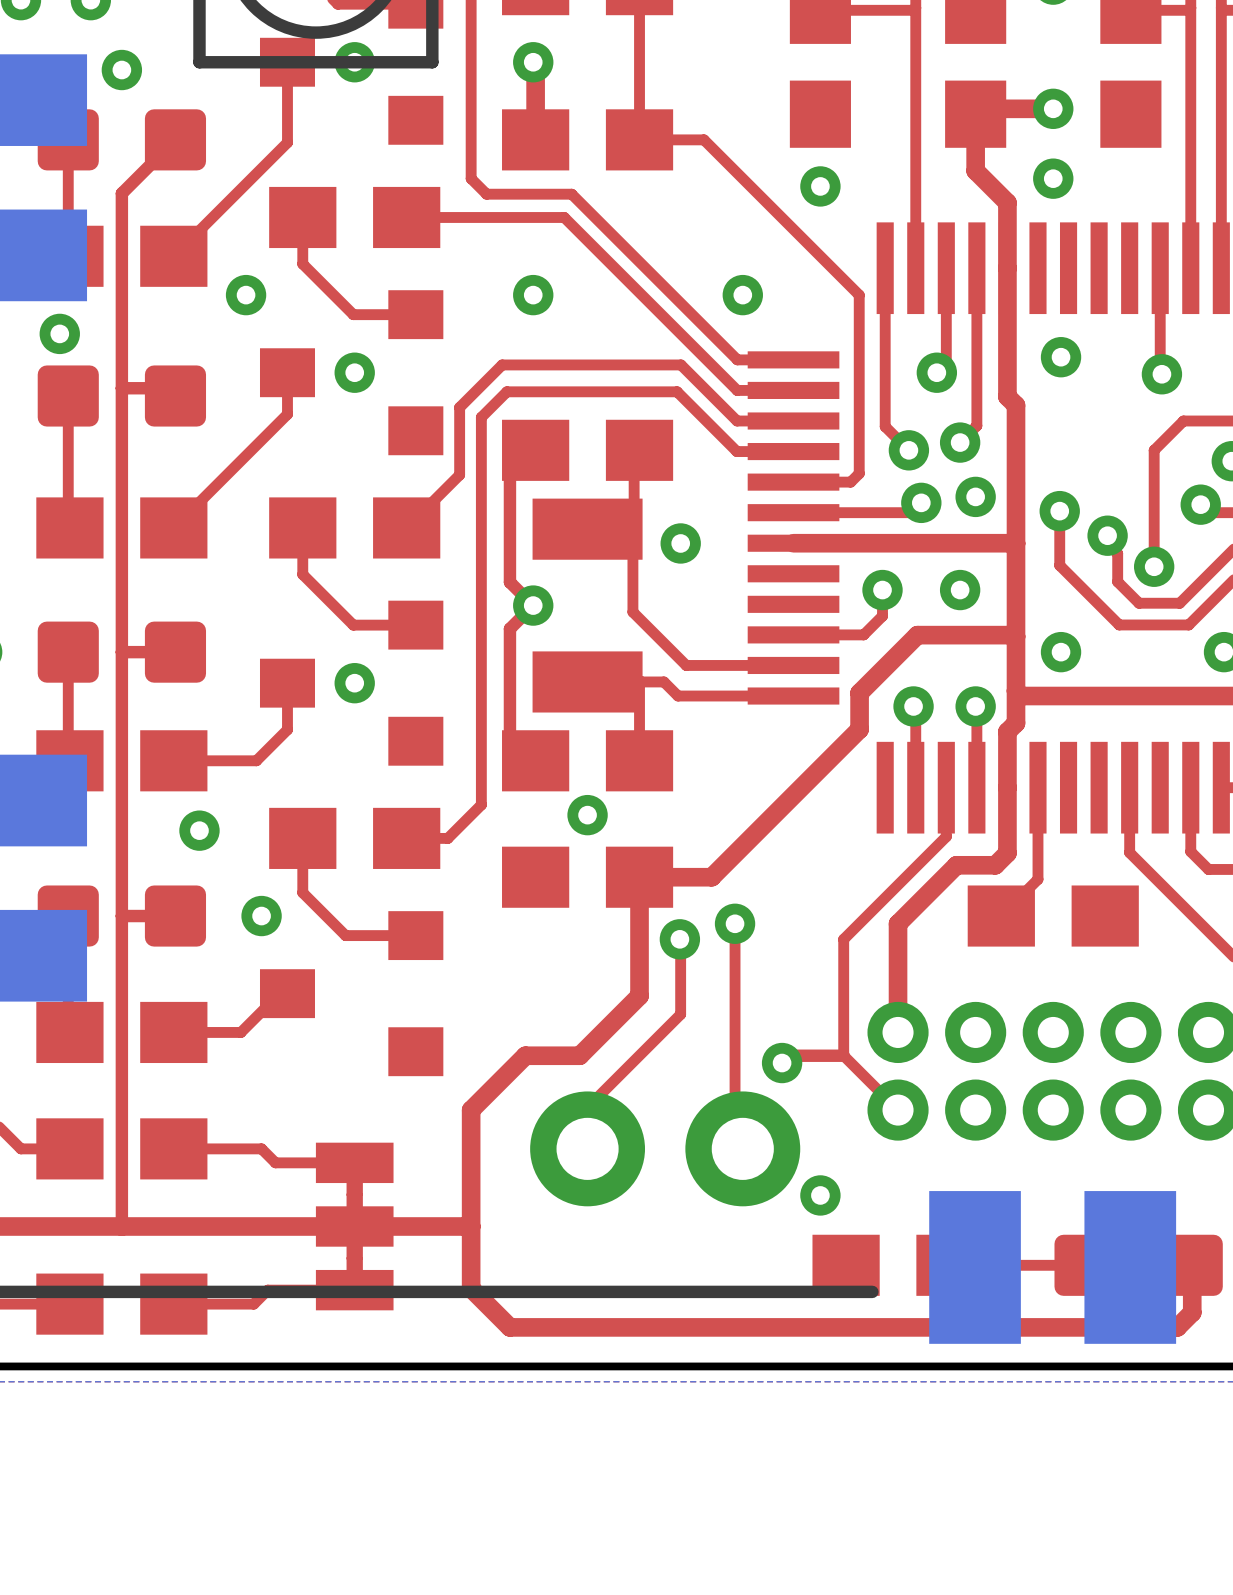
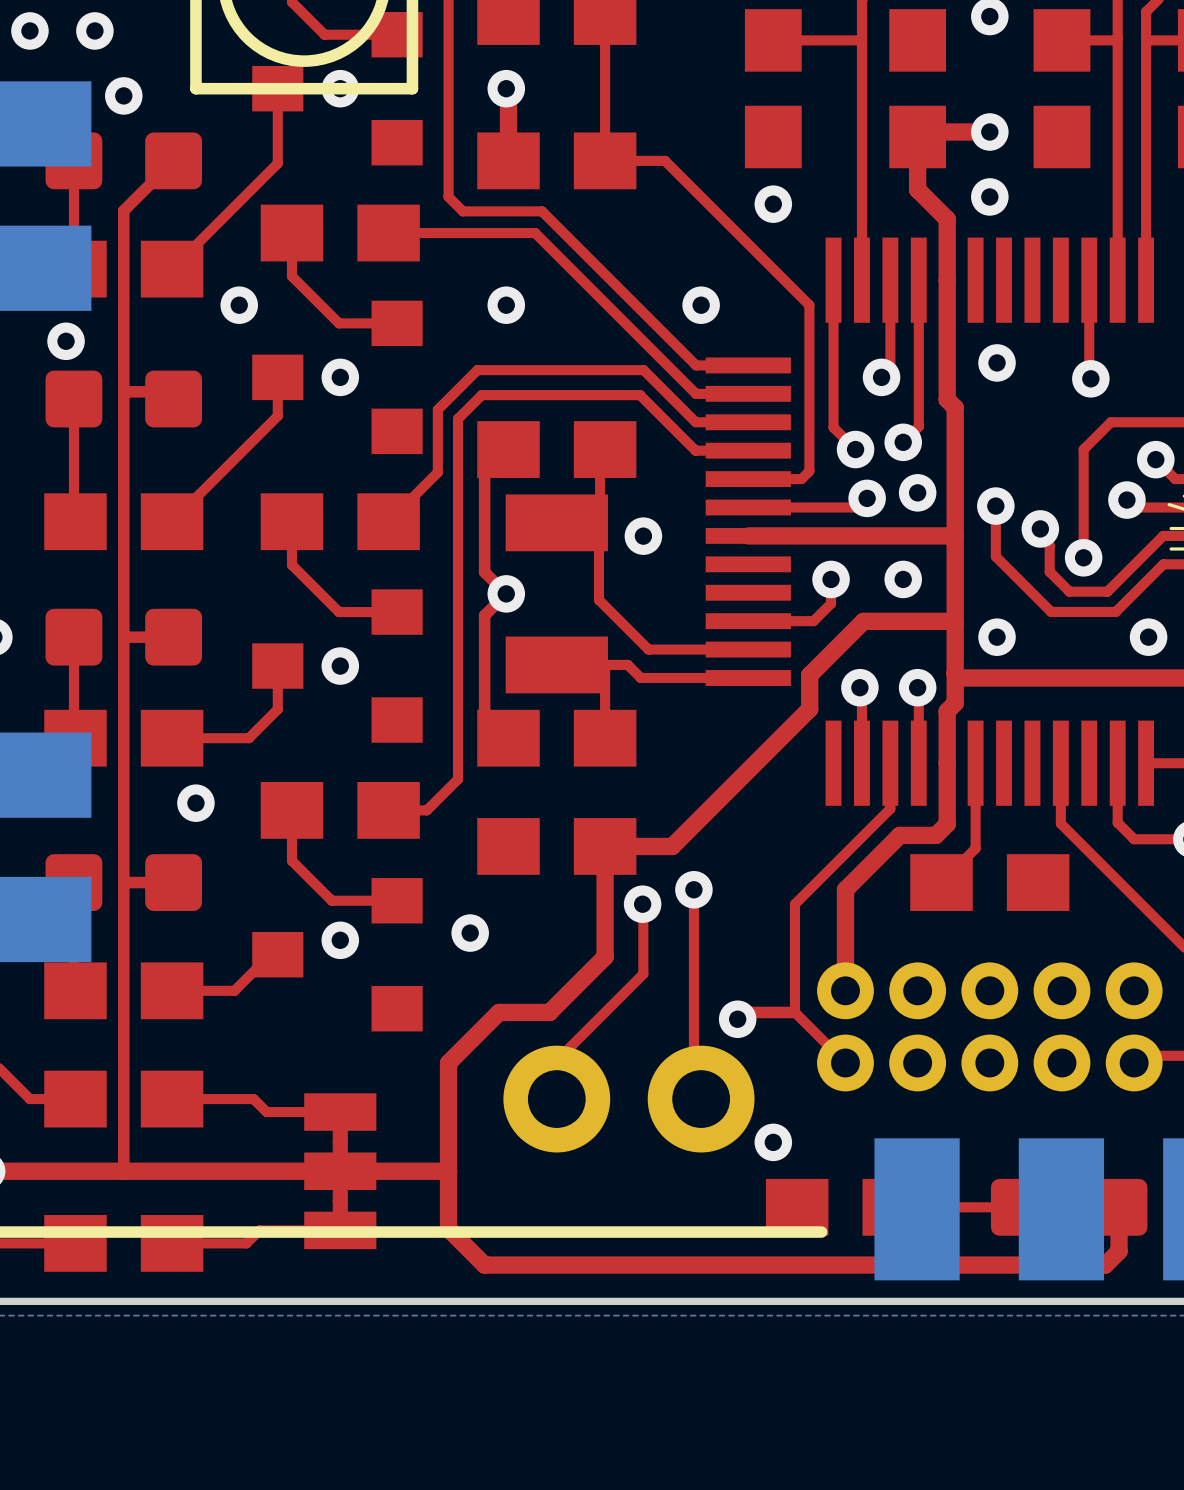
via: (587, 815) -> none
via position: (261, 916) -> (340, 940)
via: none -> (470, 933)

